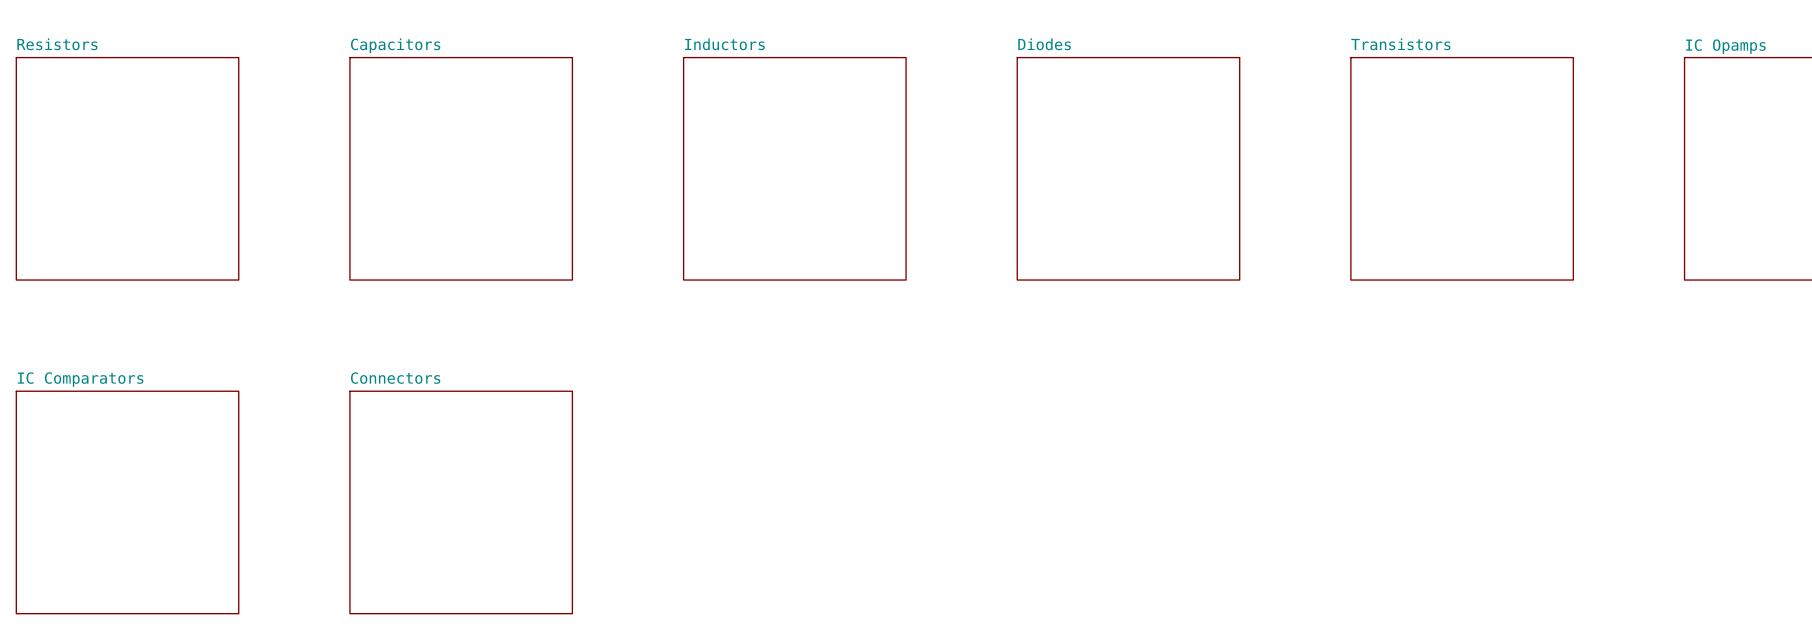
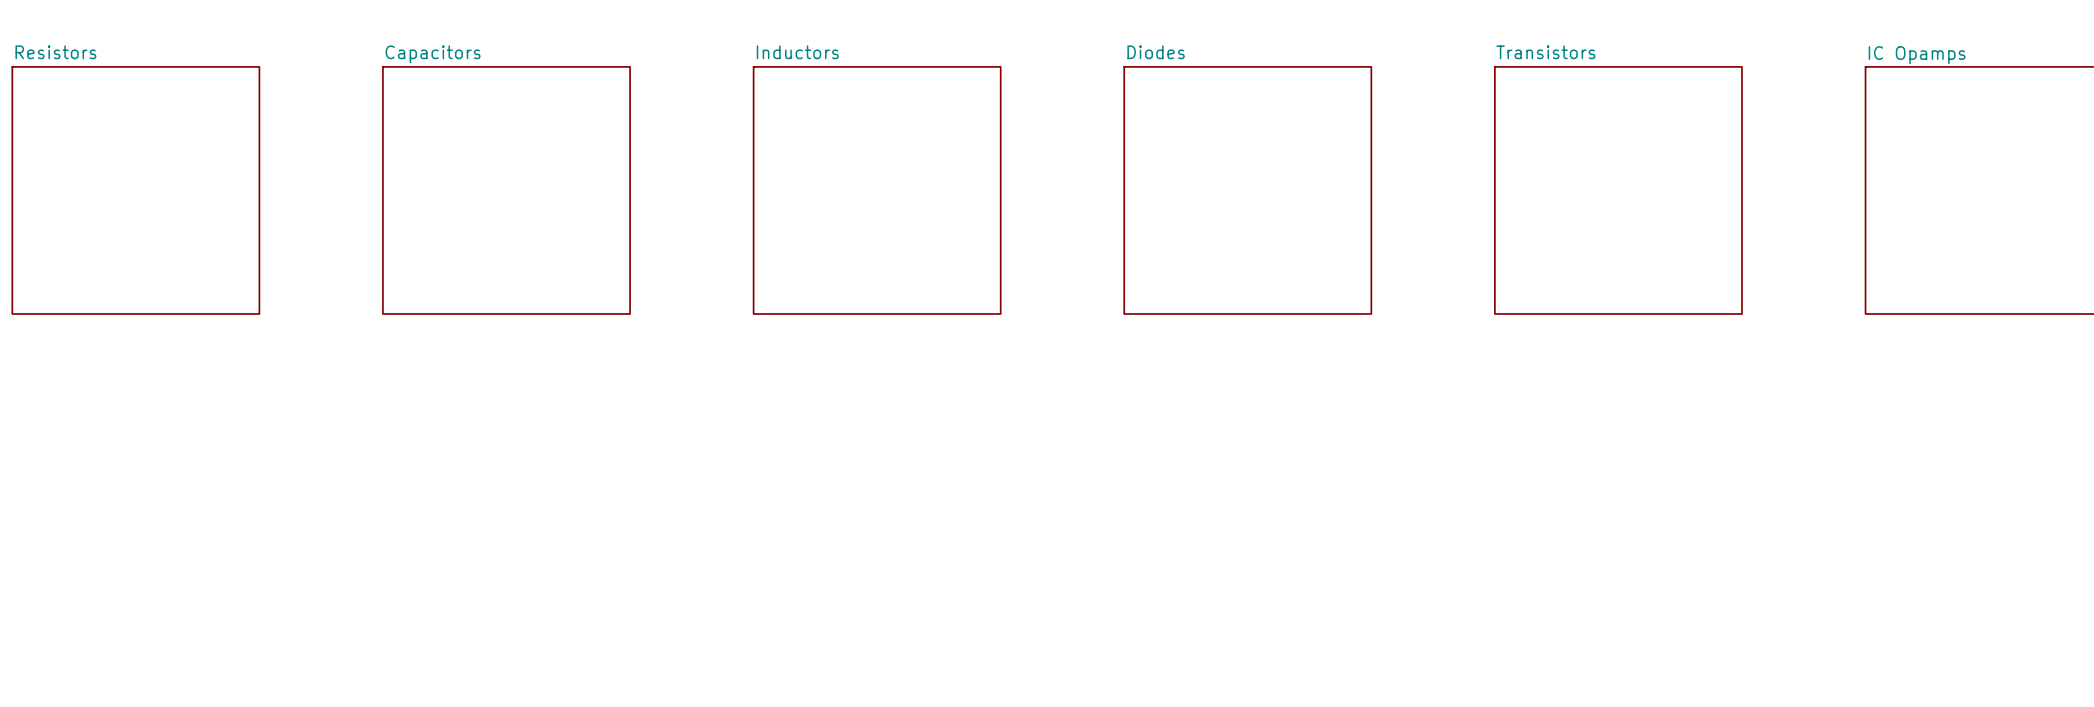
sheet IC Comparators: (127, 502) -> none
sheet Connectors: (461, 502) -> none

